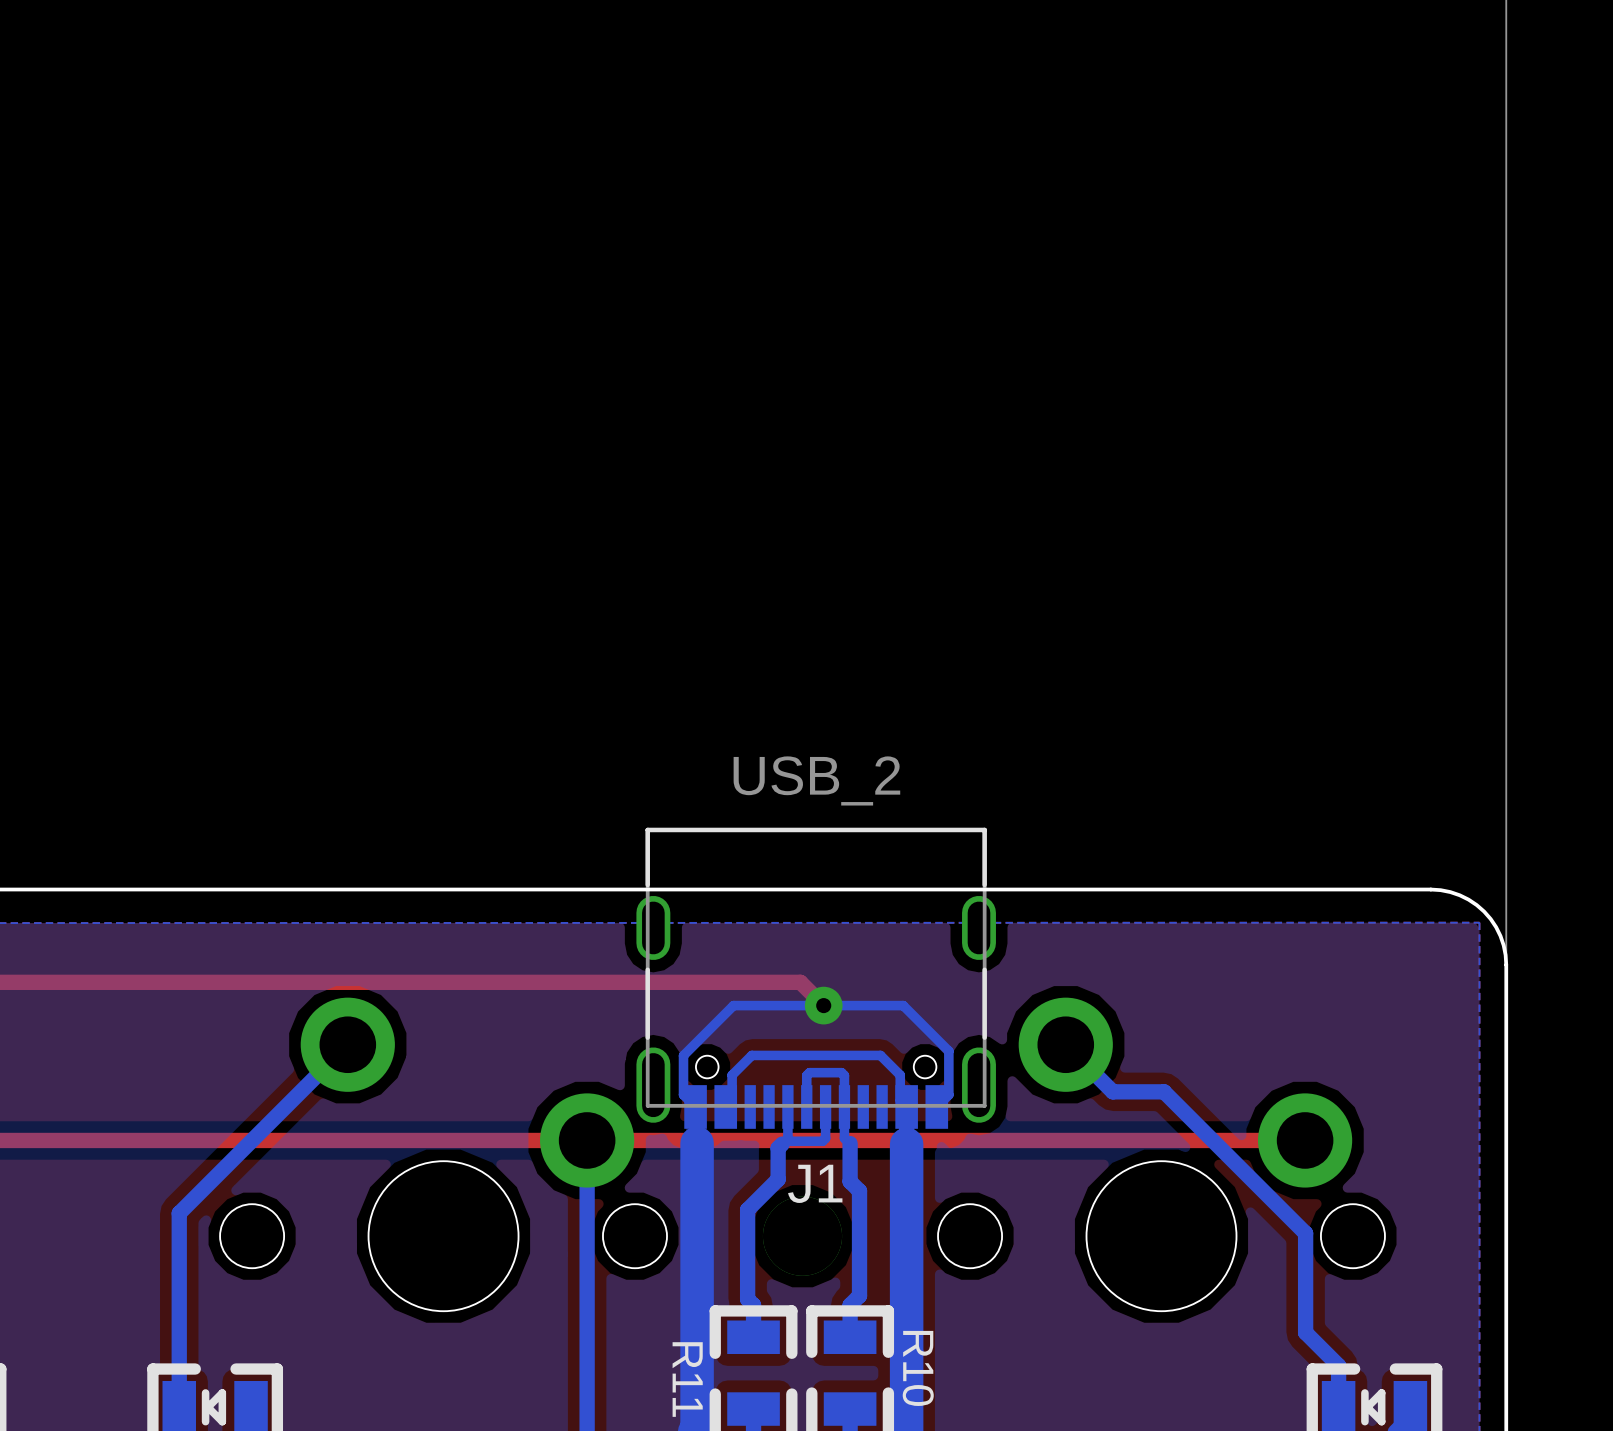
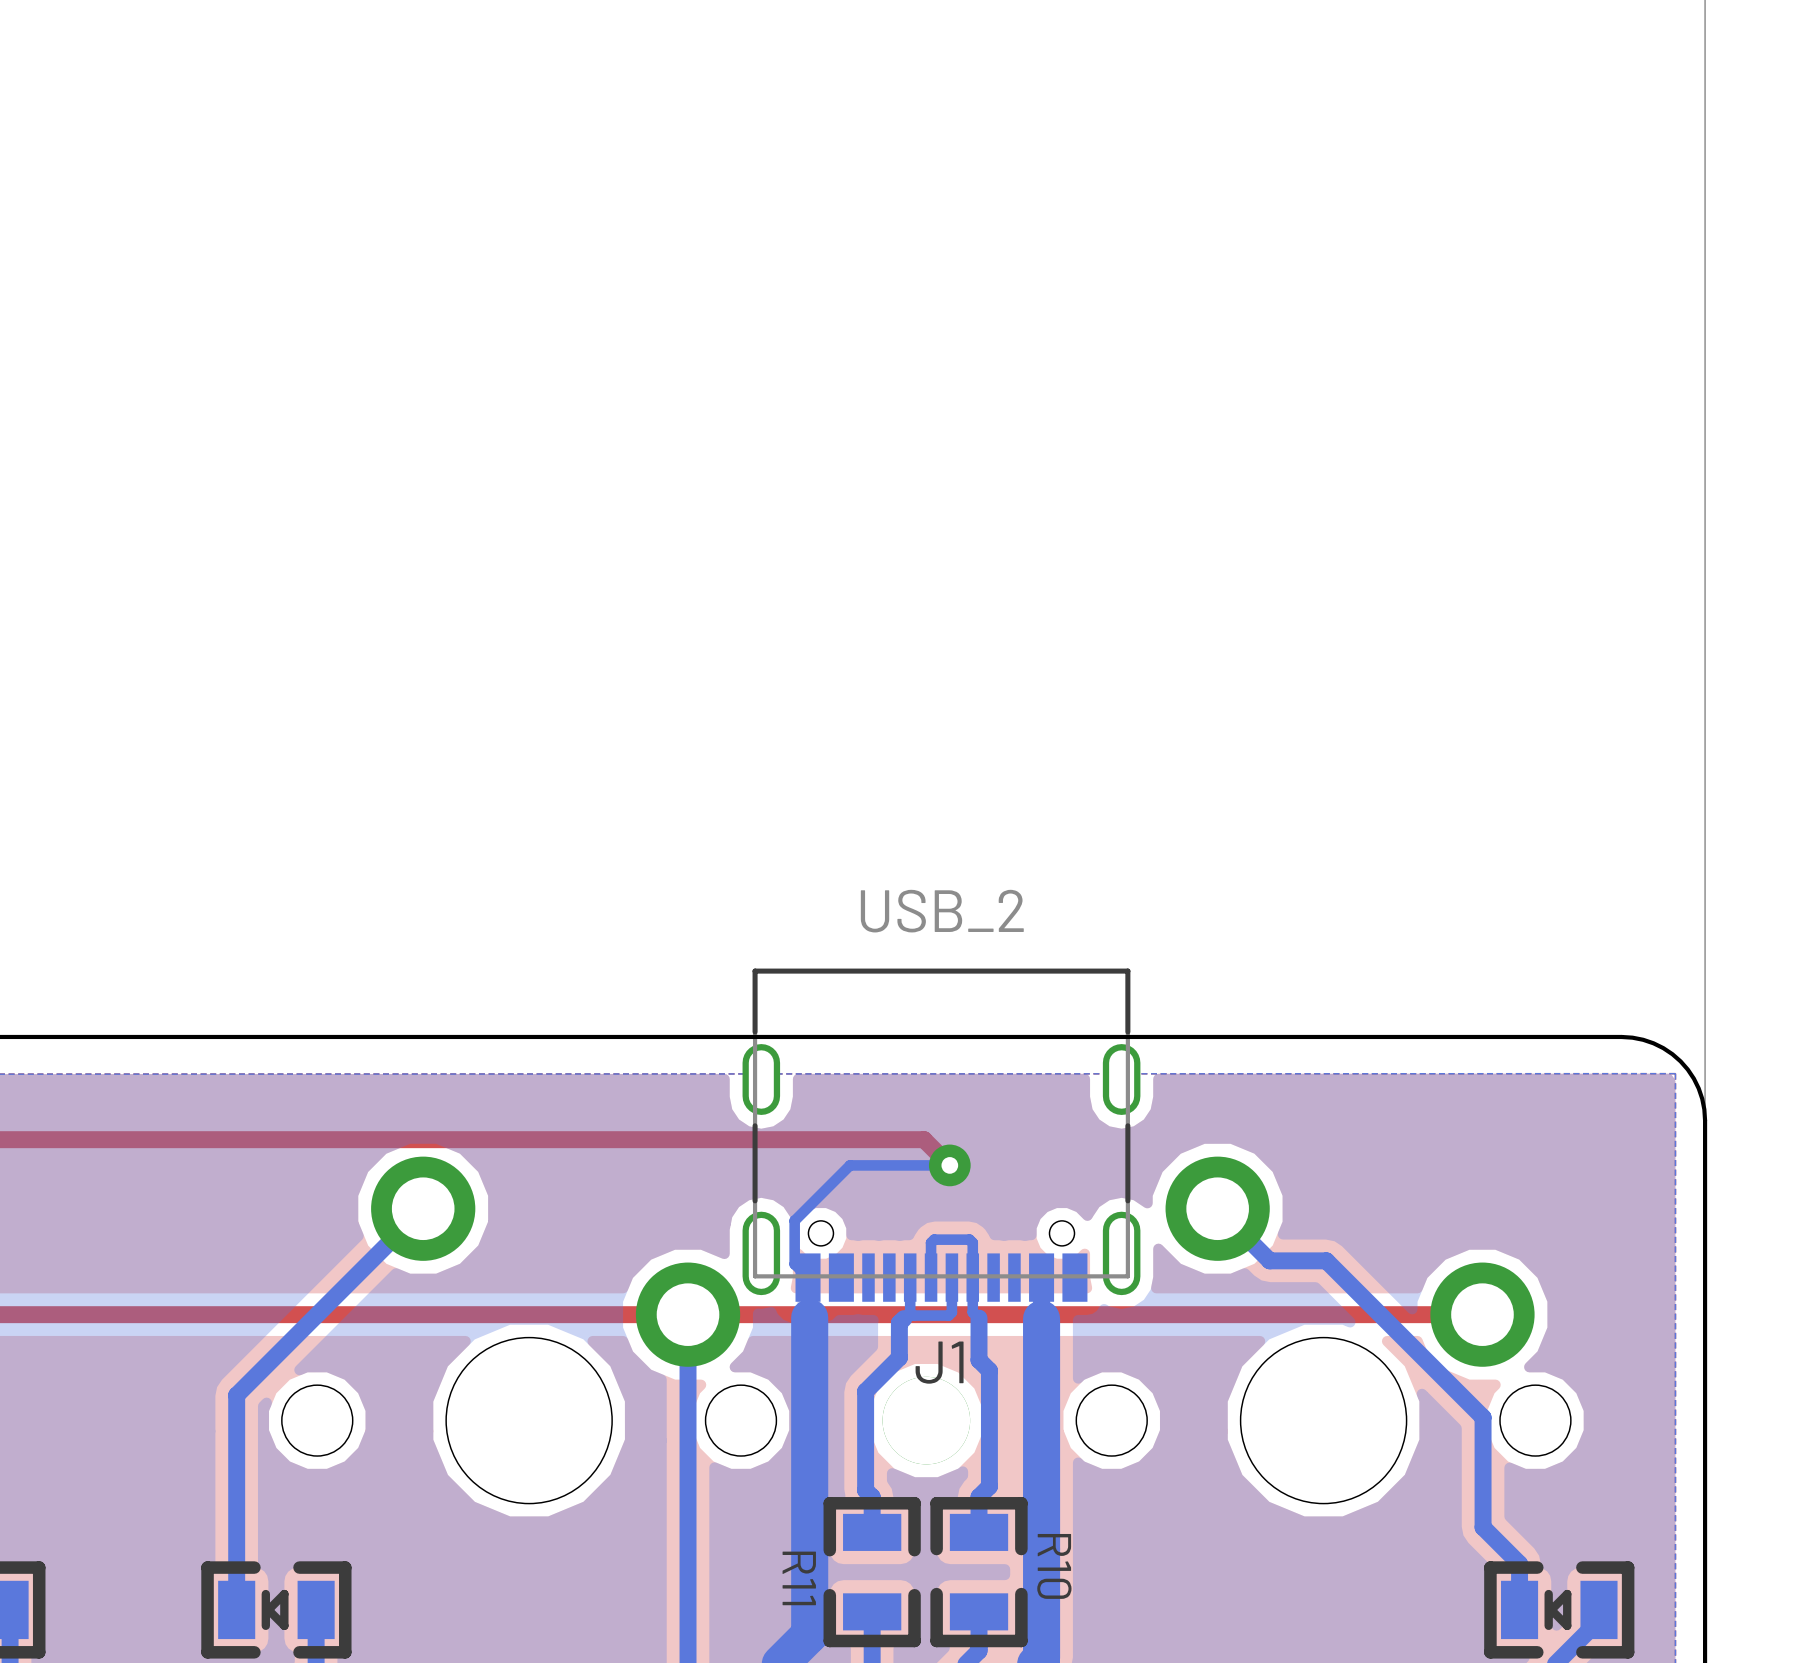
bottom track: (823, 1005) (903, 1005) (948, 1051) (948, 1094) (936, 1106) -> none
bottom track: (906, 1106) (900, 1100) (900, 1075) (880, 1055) (751, 1055) (732, 1075) (732, 1100) (725, 1106) -> none

